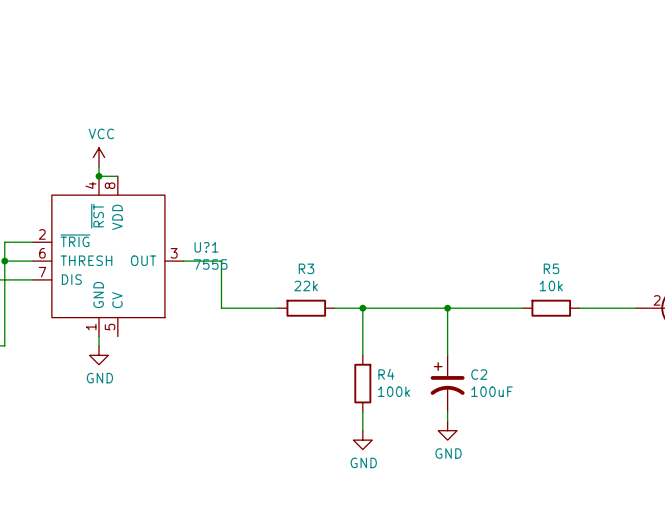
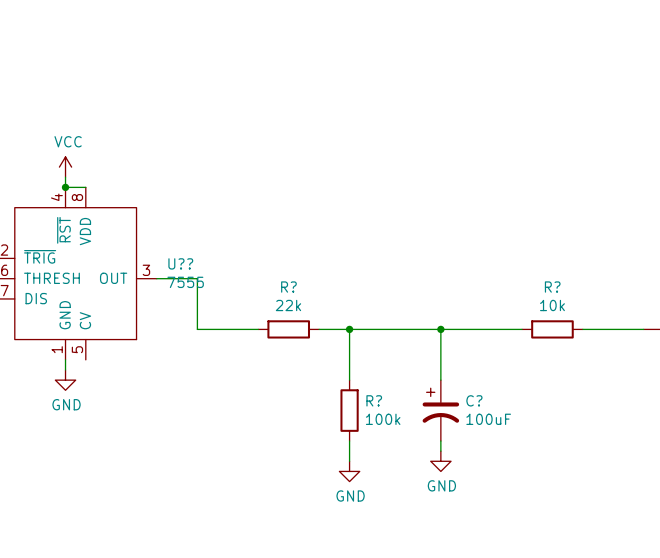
U?1 name: U?1 (206, 247) -> U?? (180, 263)
R3 name: R3 (306, 268) -> R? (288, 287)
R5 name: R5 (551, 268) -> R? (552, 287)
R4 name: R4 (386, 374) -> R? (374, 400)
C2 name: C2 (479, 374) -> C? (474, 400)

